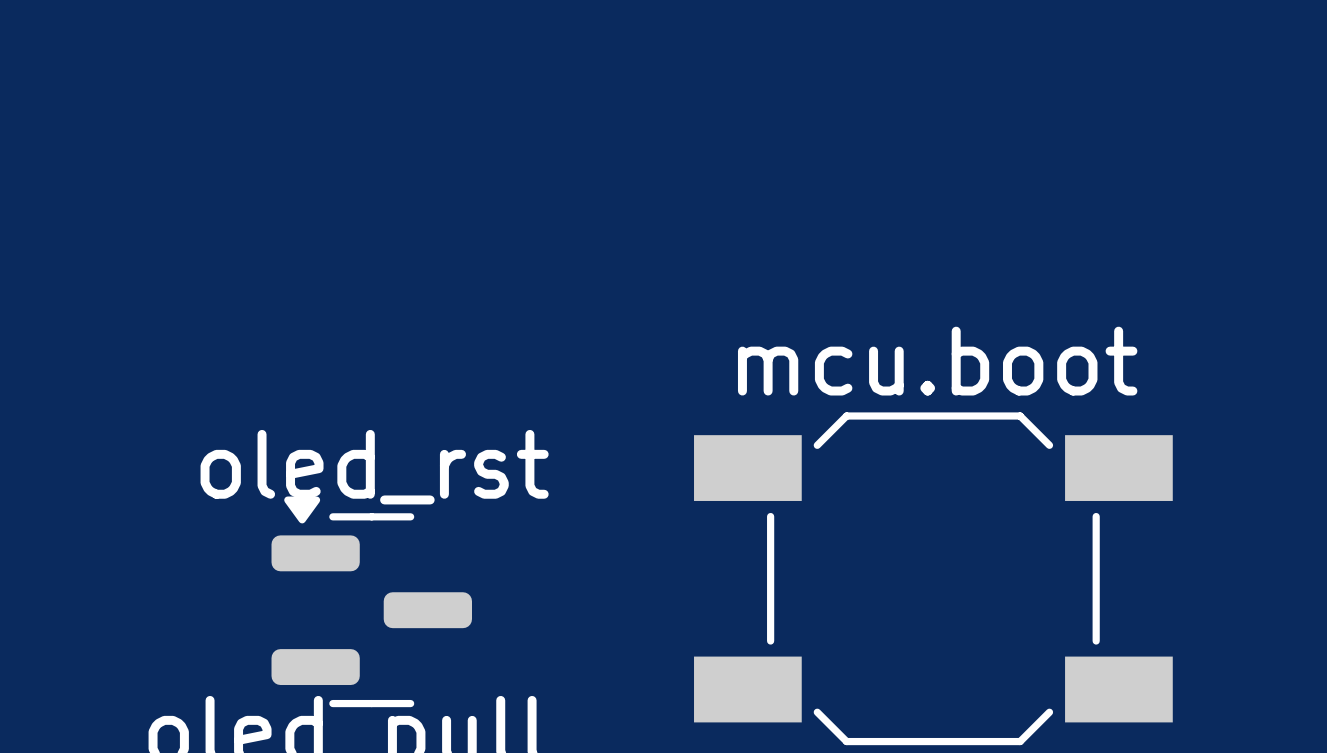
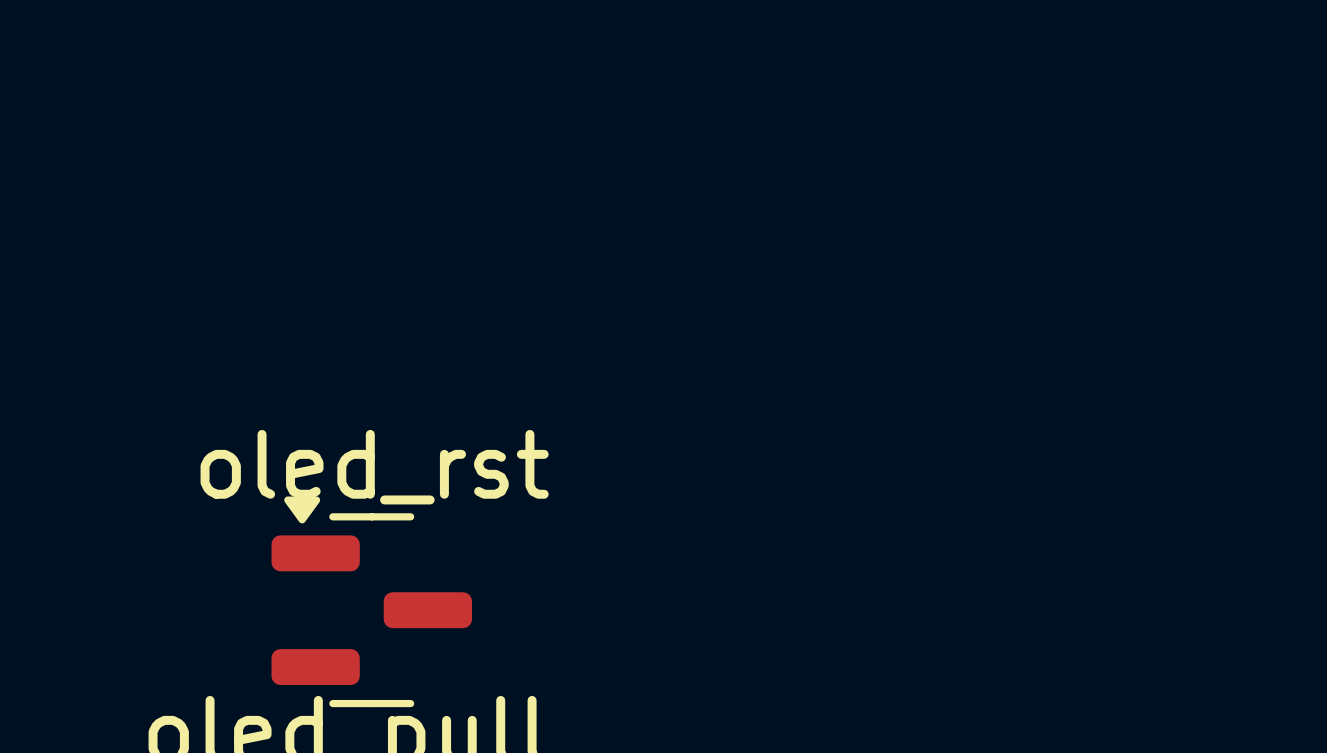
mcu.boot: (933, 578) -> none

